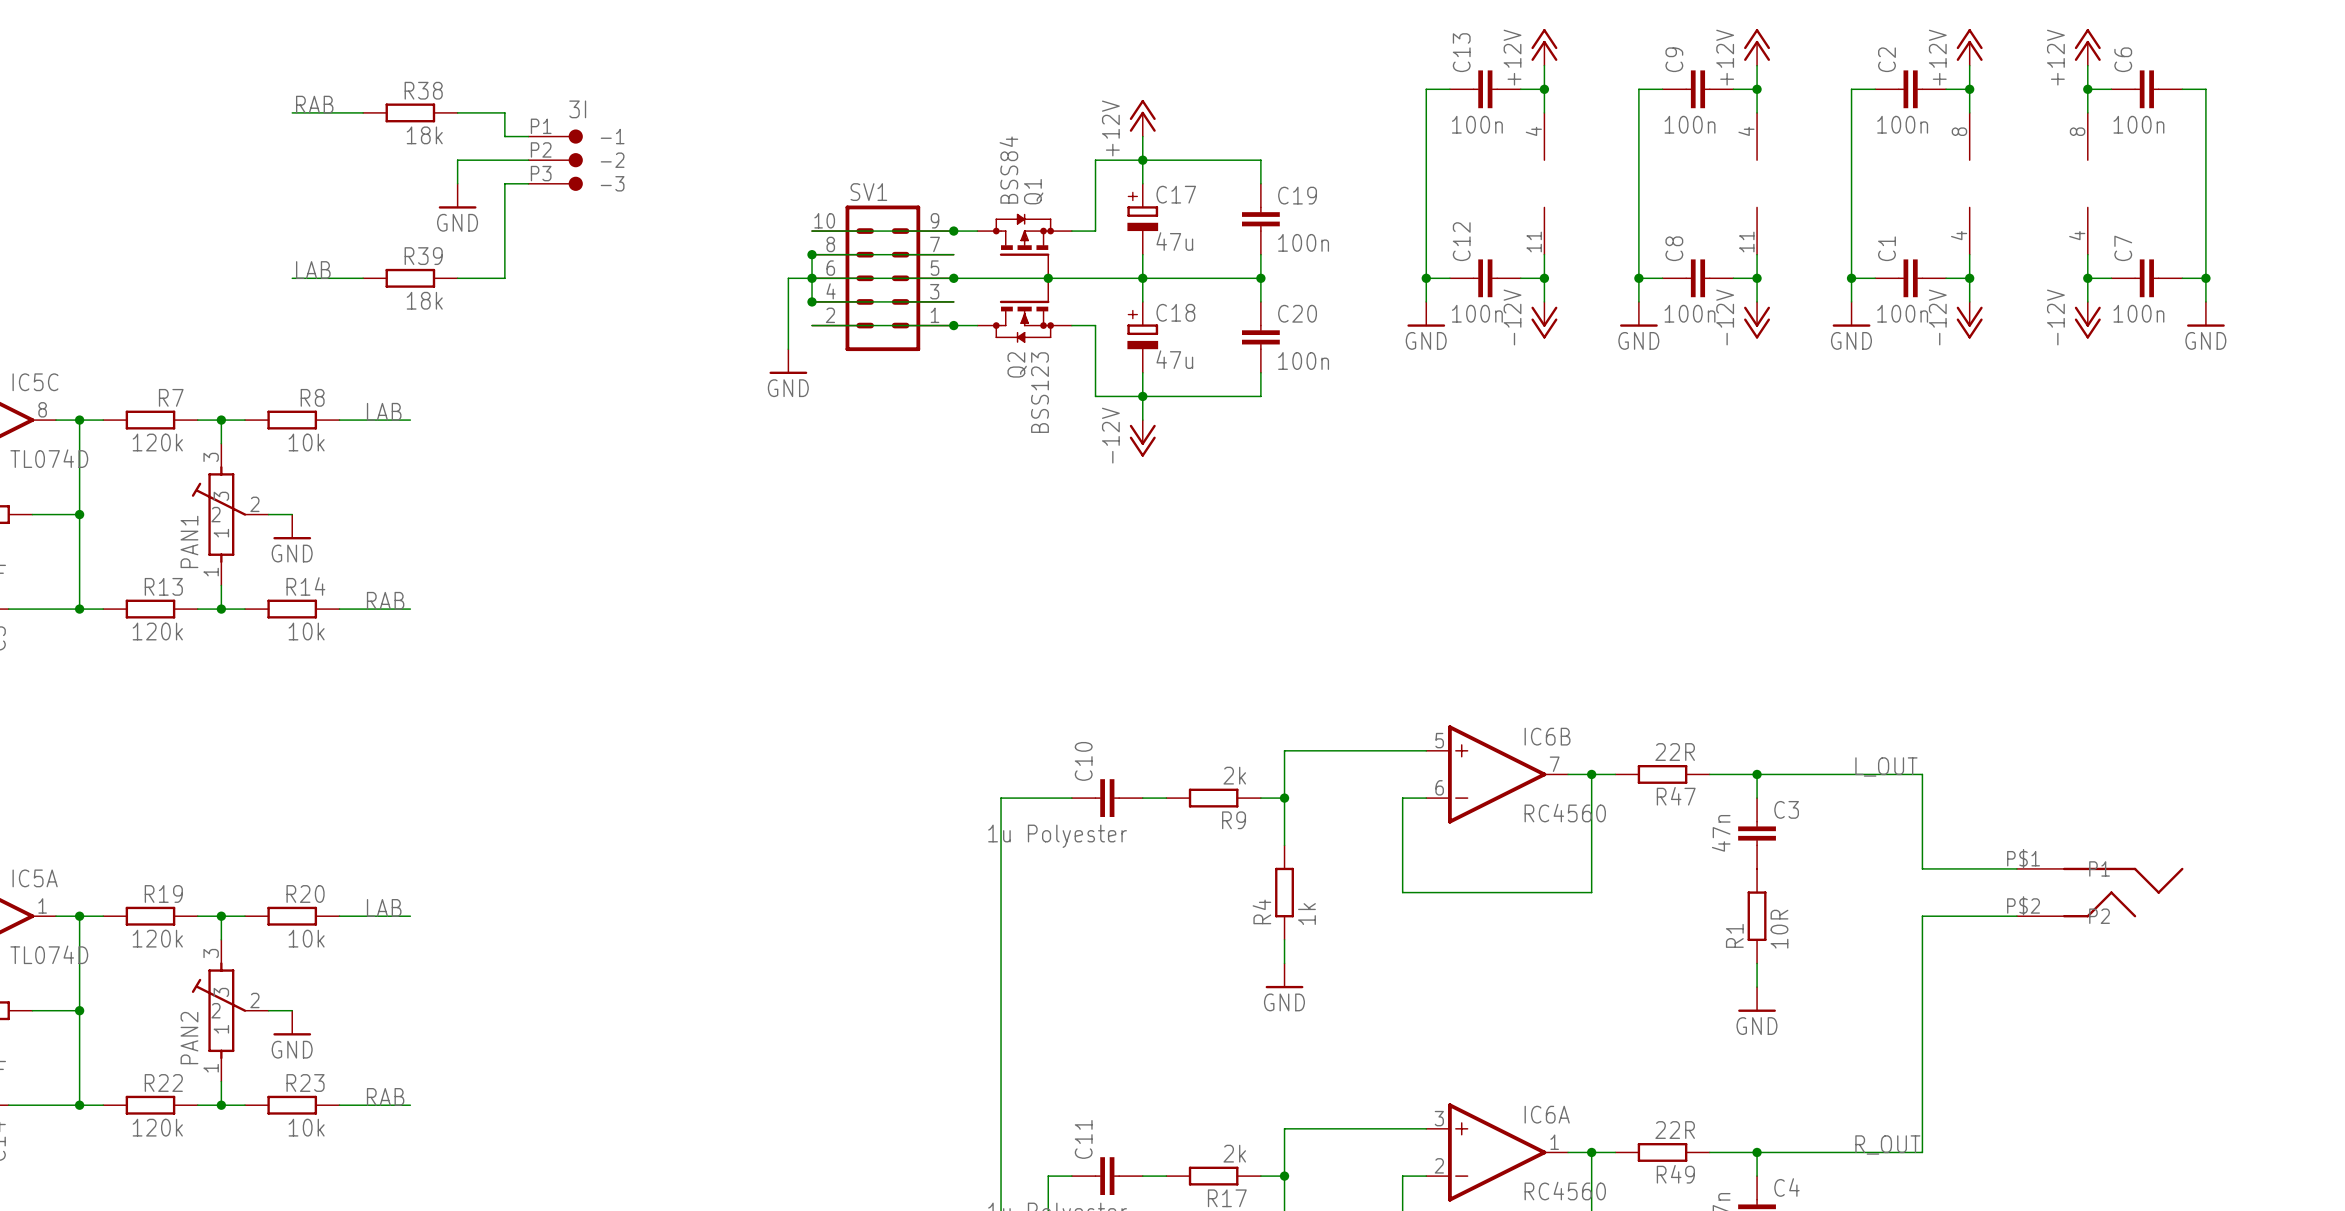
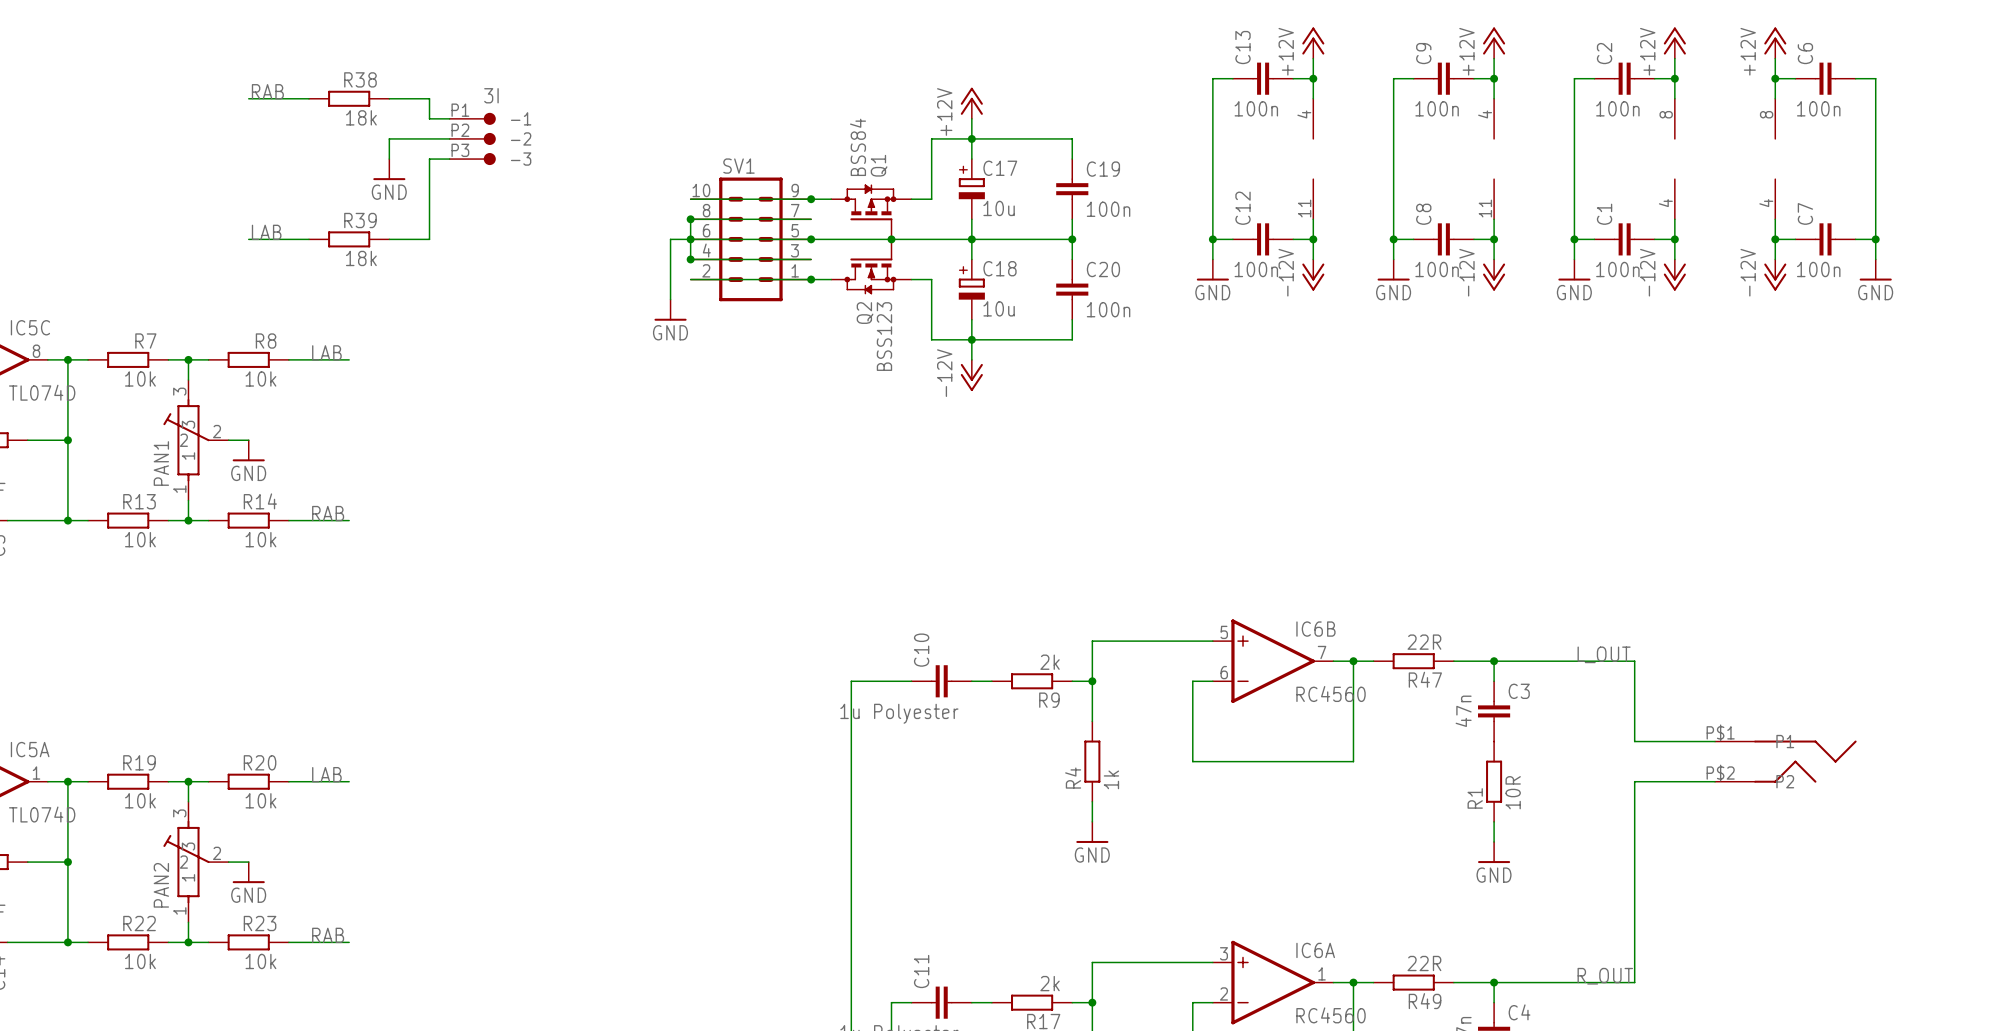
C17 value: 47u (1174, 241) -> 10u (999, 208)
C18 value: 47u (1174, 359) -> 10u (999, 308)
R7 value: 120k (157, 442) -> 10k (140, 378)
R13 value: 120k (157, 631) -> 10k (140, 539)
R19 value: 120k (157, 938) -> 10k (140, 800)
R22 value: 120k (157, 1127) -> 10k (140, 961)

